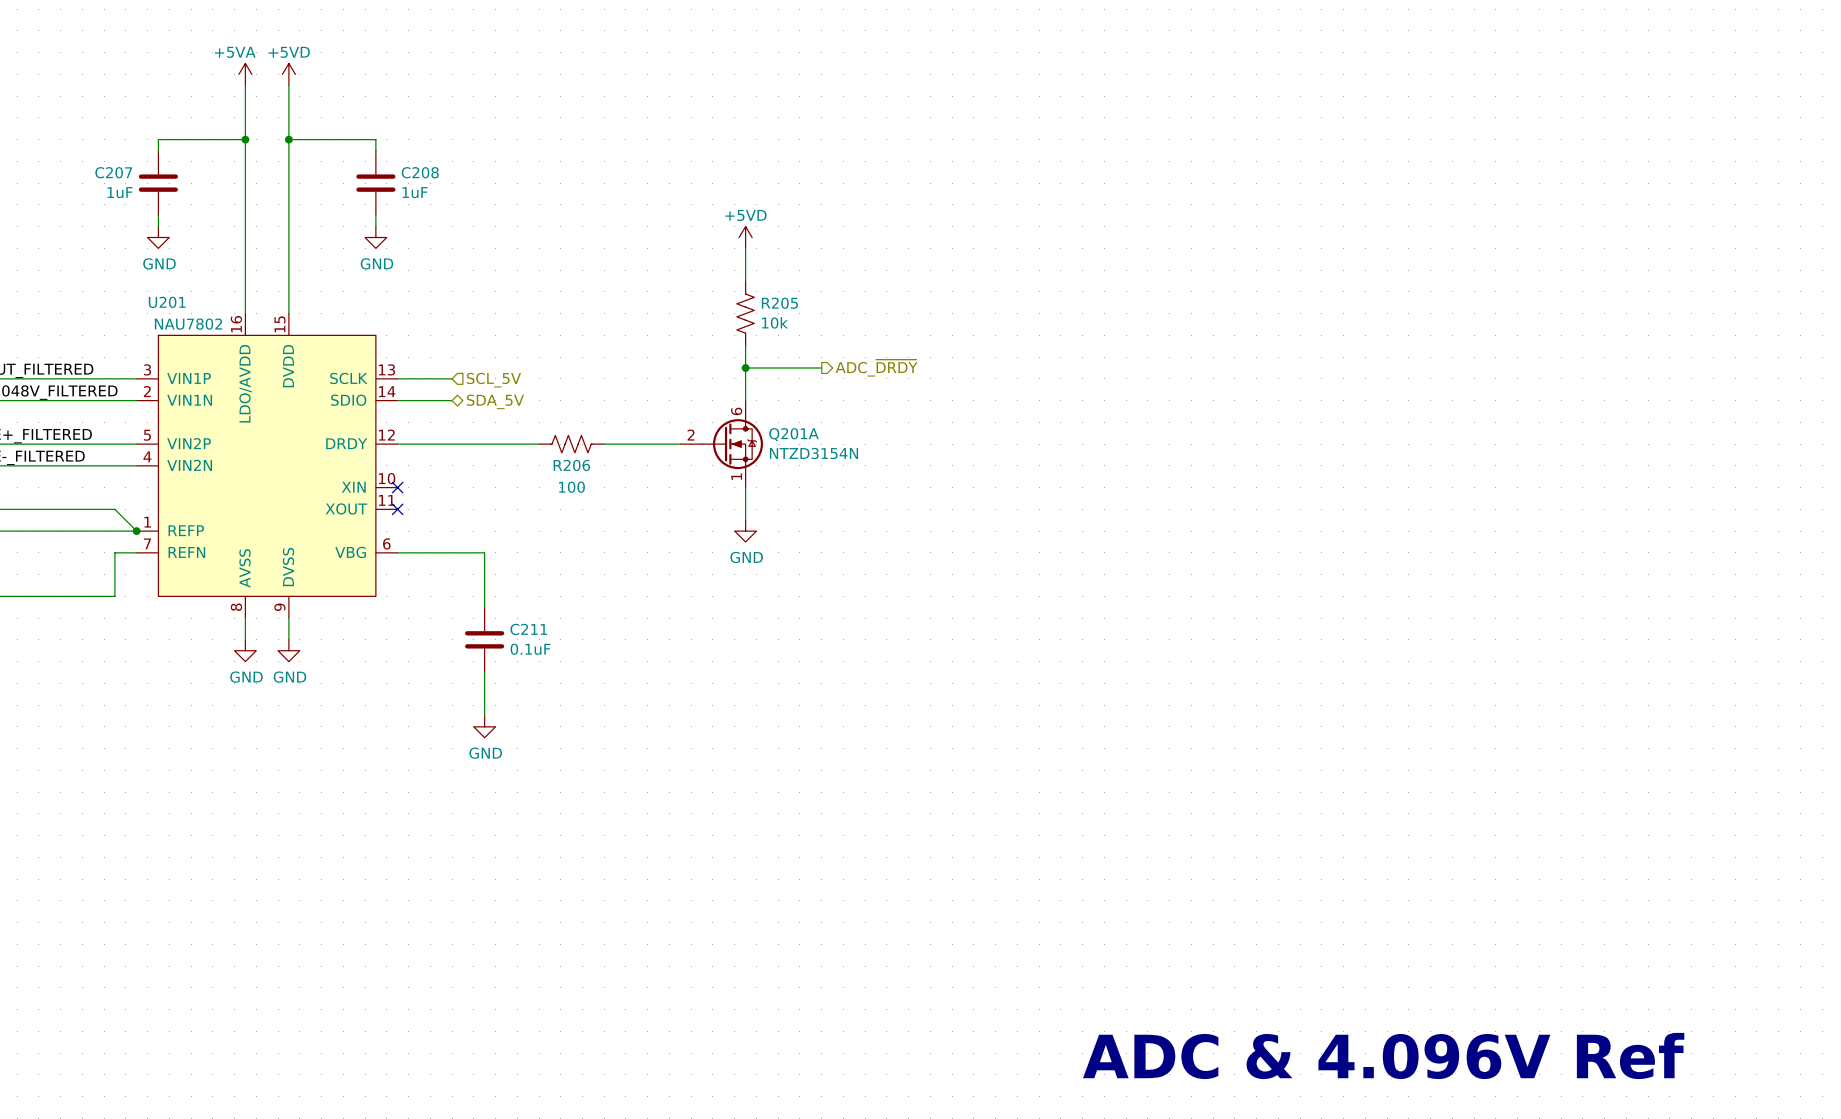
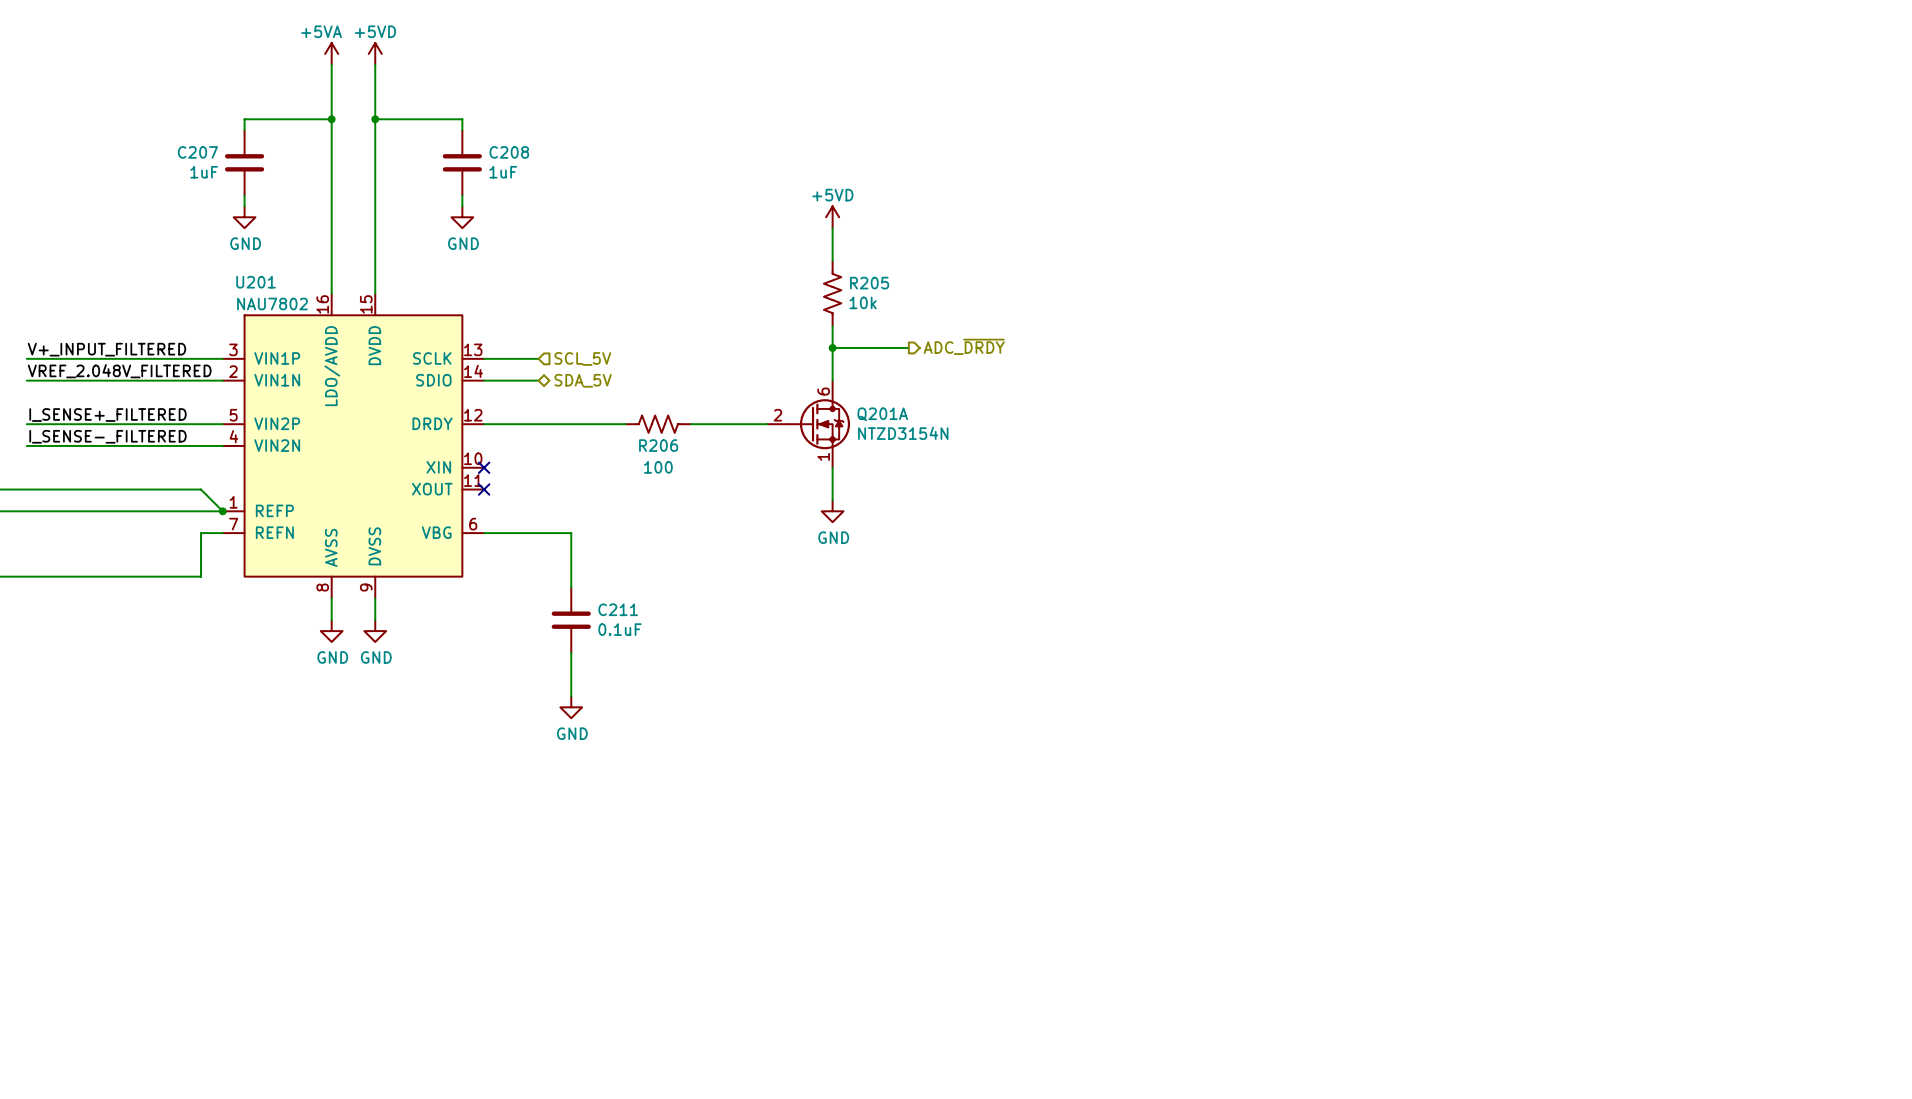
text: ADC & 4.096V Ref (1383, 1055) -> none

